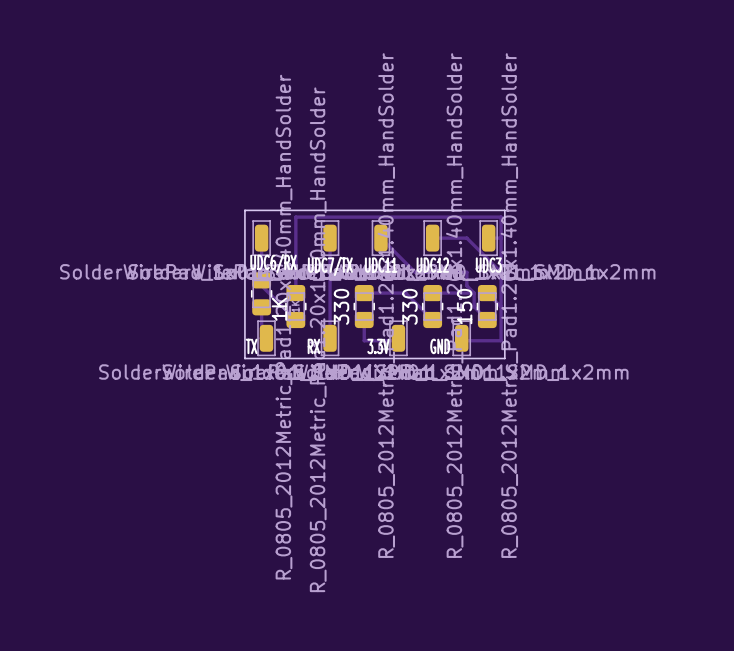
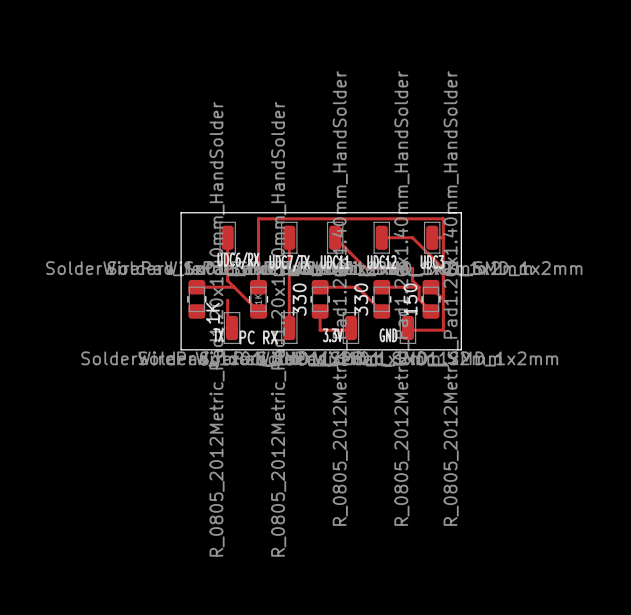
board edge: (244, 210) (244, 358) (504, 358) (504, 210) -> (212, 212) (181, 212) (181, 349) (461, 349) (461, 212) (446, 212)
track: none -> (196, 287) (234, 287)
1K position: (261, 293) -> (196, 299)
RX name: RX (313, 346) -> PC RX (258, 337)

